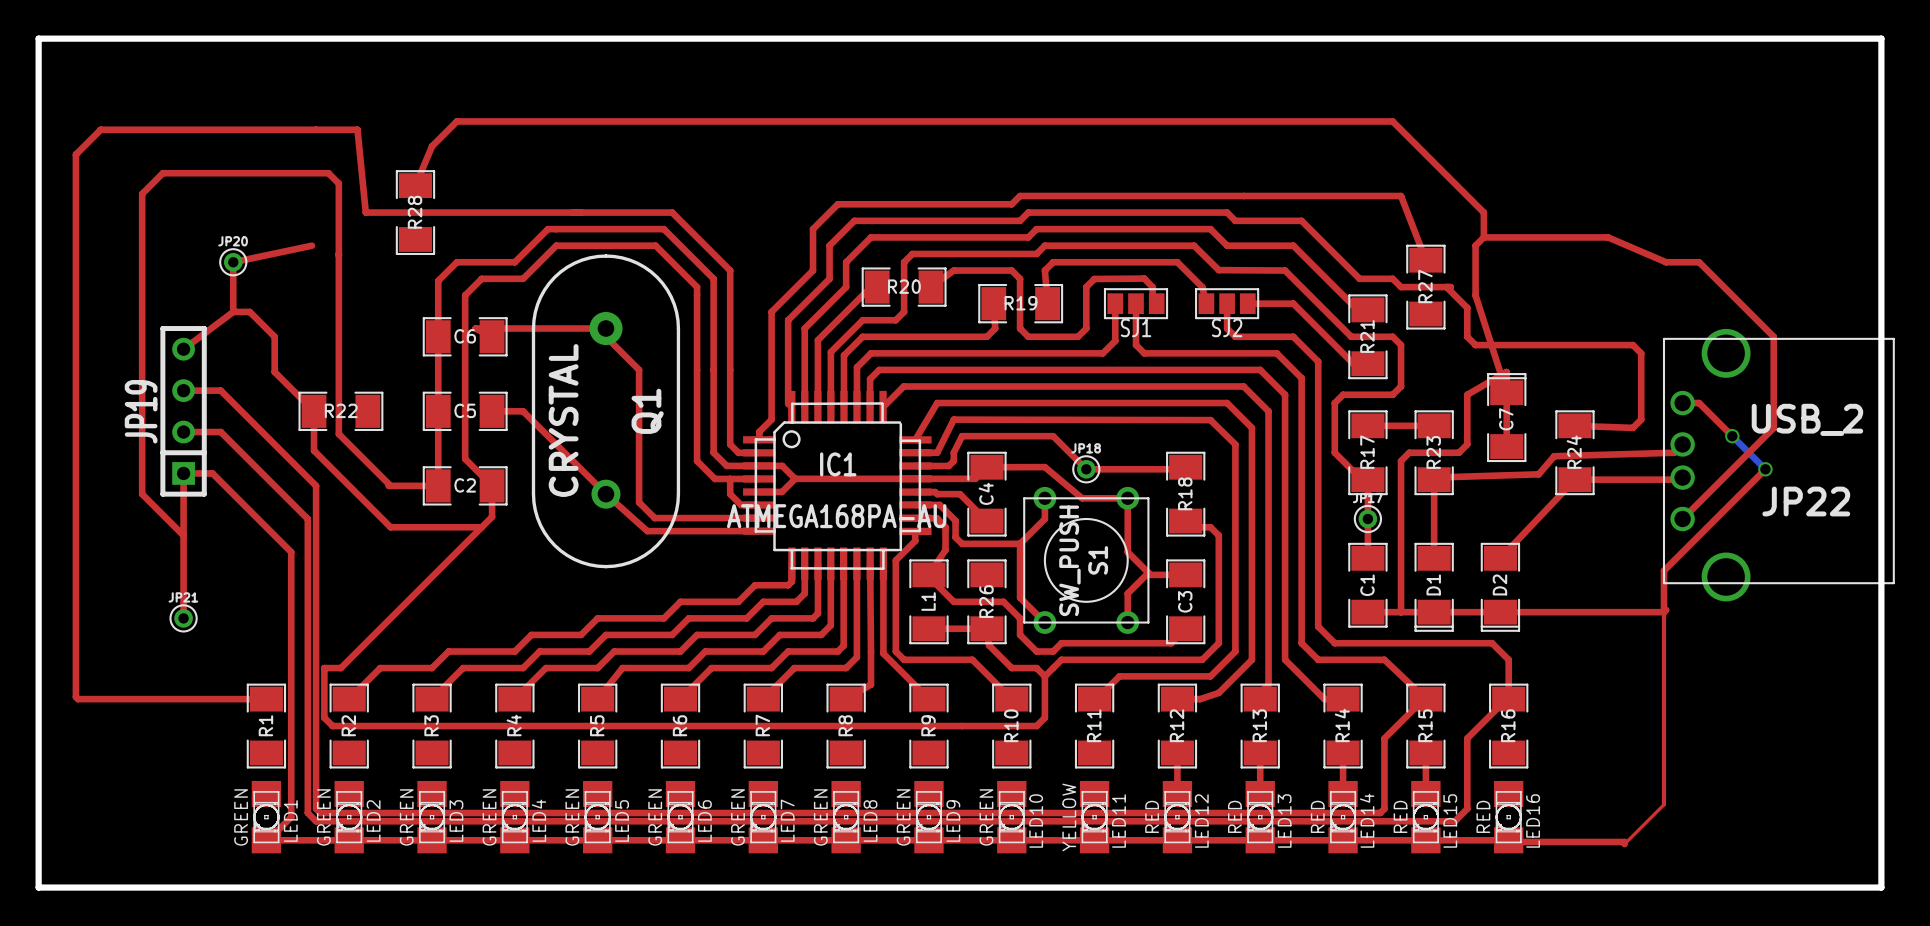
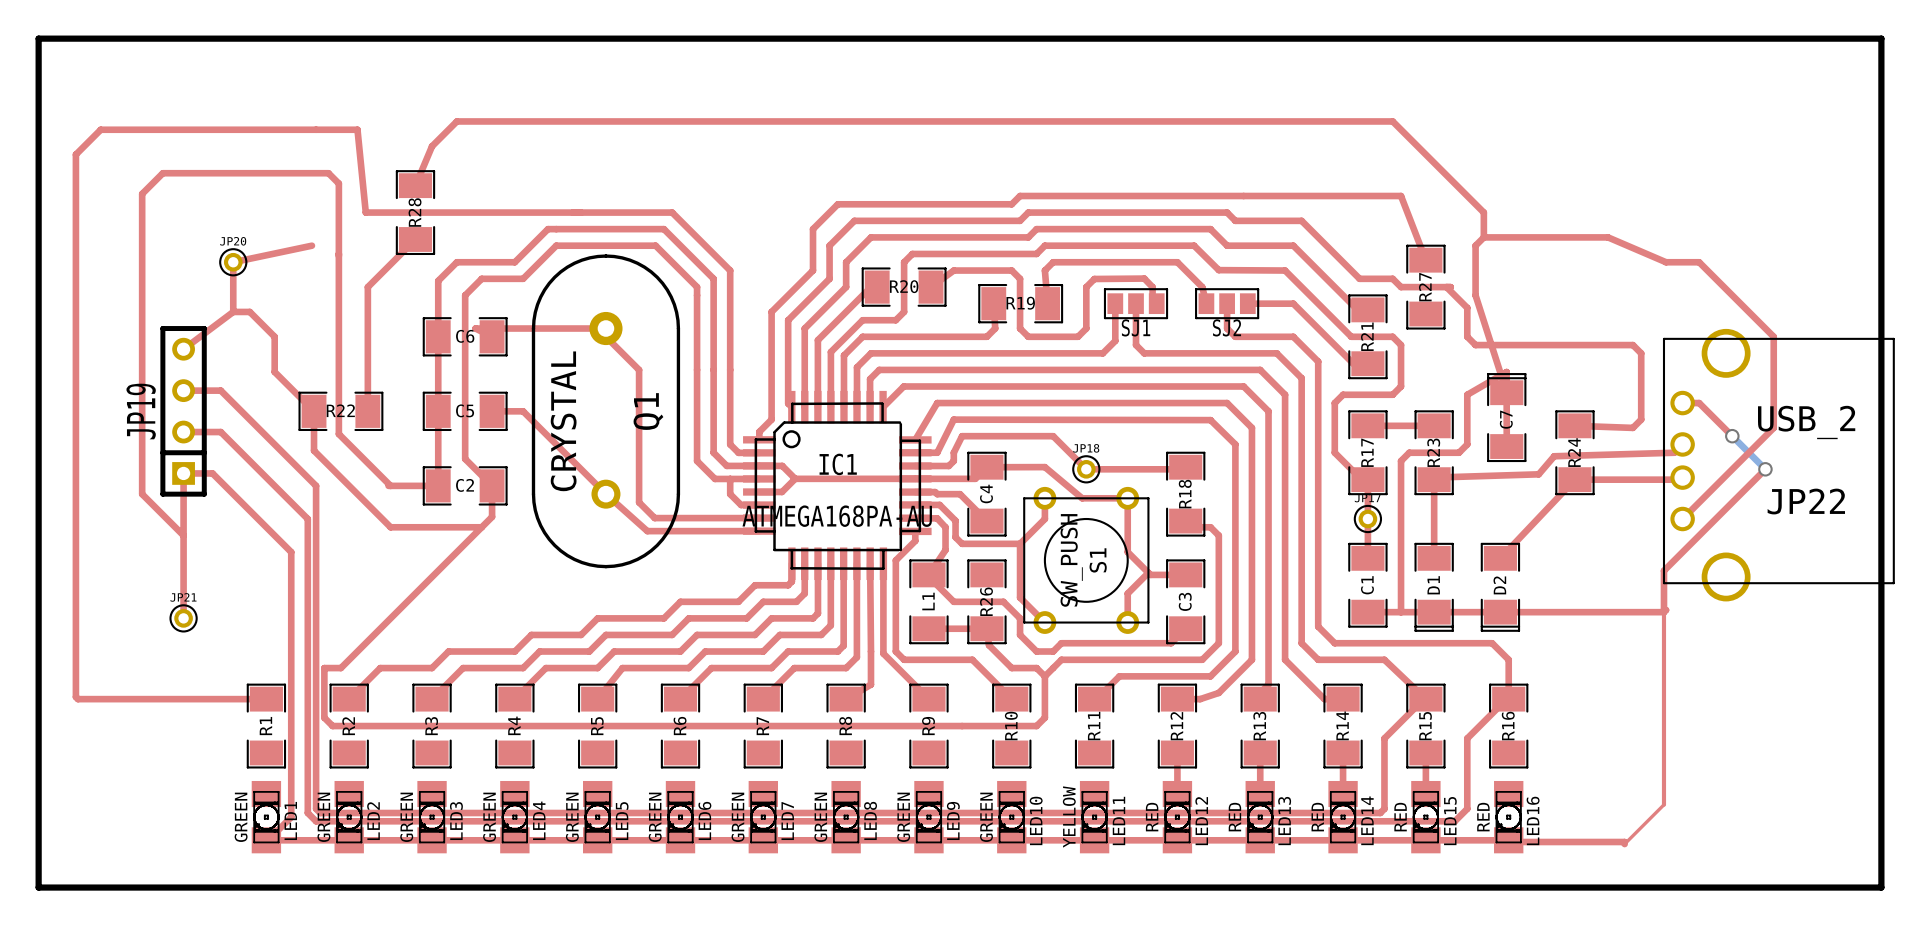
top track: none -> (415, 239) (367, 287) (367, 411)

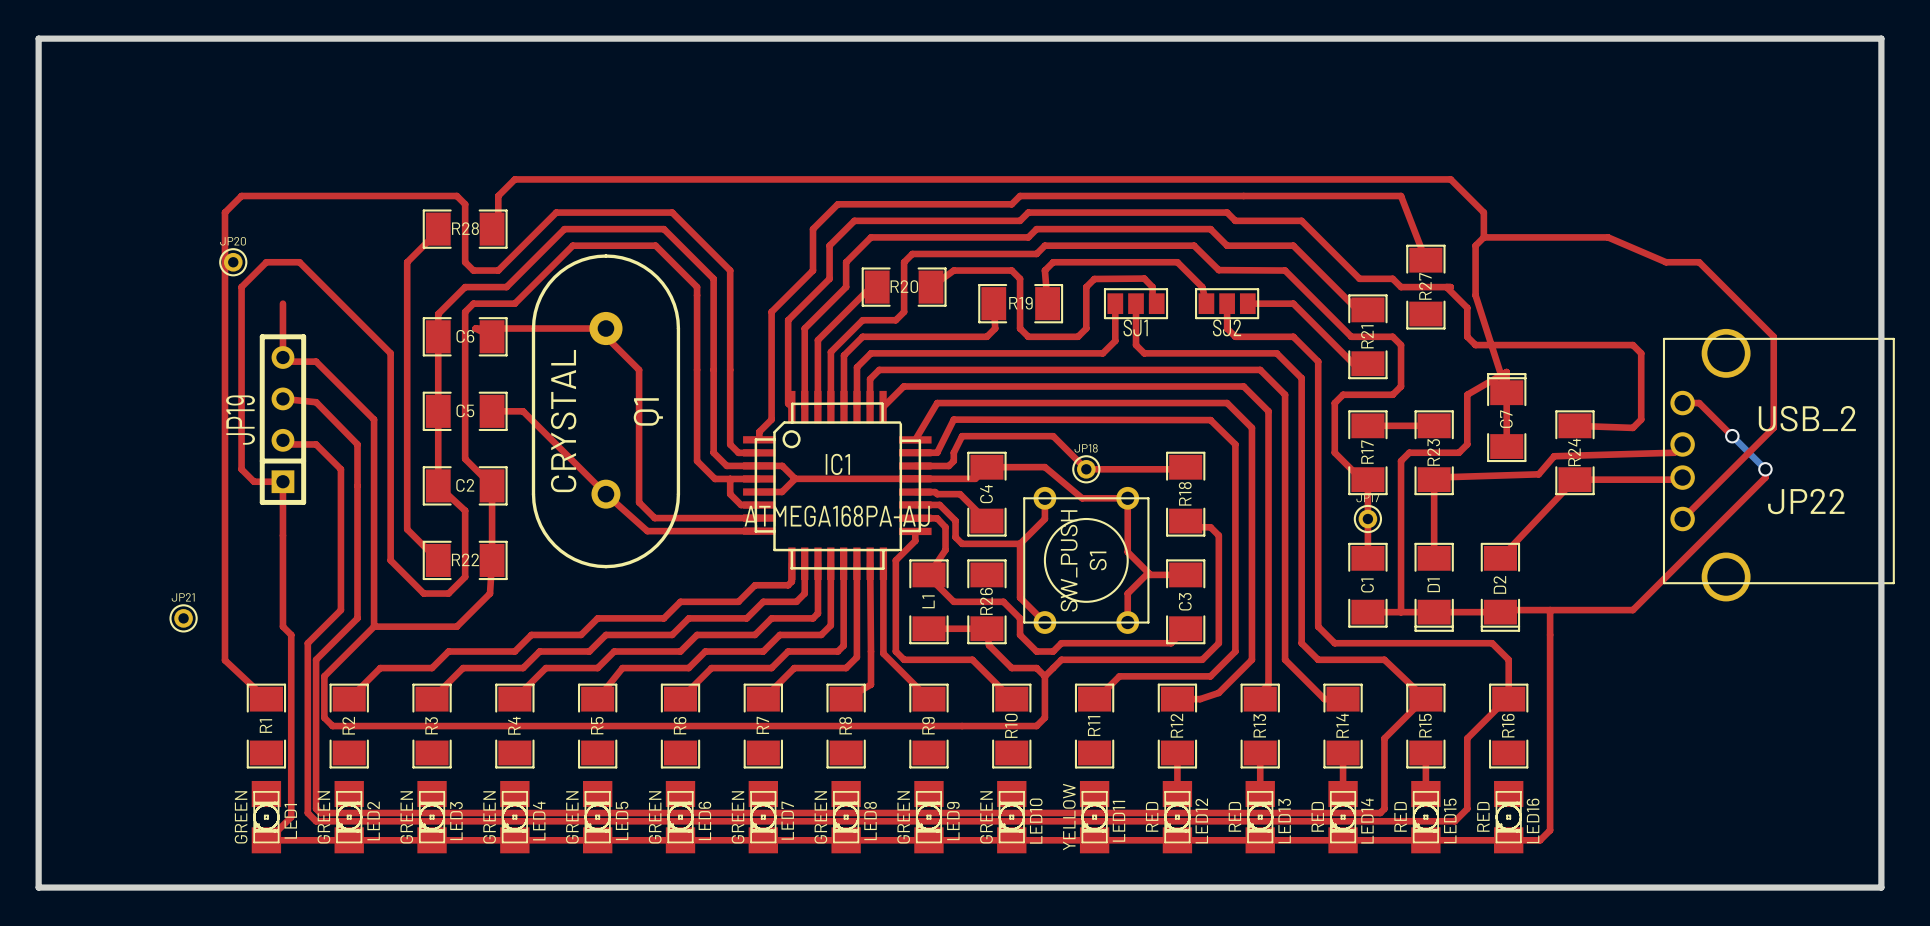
top track: (1450, 179) (1392, 121) (456, 121) (432, 146) (415, 185) -> (1450, 179) (514, 179) (498, 196) (498, 222) (492, 229)
R28 rotation: 0° (415, 212) -> 90° clockwise (465, 229)
R28 position: (415, 212) -> (465, 229)
top track: (556, 212) (365, 212) (357, 129) (100, 129) (75, 154) (75, 697) (77, 699) (266, 699) -> (556, 212) (498, 270) (473, 270) (465, 262) (465, 204) (456, 196) (241, 196) (224, 212) (224, 660) (266, 699)
top track: none -> (438, 229) (407, 262) (407, 529) (438, 560)
top track: (564, 229) (547, 229) (514, 262) (456, 262) (438, 280) (438, 314) -> (564, 229) (506, 287) (465, 287) (438, 314)
top track: (415, 239) (367, 287) (367, 411) -> none
top track: (311, 245) (233, 262) (233, 311) -> none
top track: (572, 245) (556, 245) (523, 278) (481, 278) (465, 295) (465, 311) -> (572, 245) (514, 303) (473, 303) (465, 311)
top track: none -> (282, 303) (282, 357) (287, 361) (316, 361) (374, 419) (374, 626)
top track: (233, 311) (249, 311) (274, 336) (274, 371) (314, 411) (314, 450) (390, 527) (481, 527) -> none
top track: (233, 311) (183, 349) -> none
top track: (183, 390) (220, 390) (316, 485) (316, 659) -> (282, 398) (316, 402) (357, 444) (357, 618) (316, 659)
JP19 position: (183, 411) -> (282, 419)
R22 position: (340, 411) -> (465, 560)
top track: (183, 432) (220, 432) (307, 519) (307, 643) -> (282, 440) (287, 444) (316, 444) (340, 469) (340, 610) (307, 643)
top track: (1765, 469) (1663, 570) (1663, 612) -> (1765, 469) (1765, 477) (1632, 610) (1502, 610) (1500, 612)
top track: (388, 485) (438, 485) -> (291, 634) (282, 626) (282, 481) (253, 481) (241, 469) (241, 287) (266, 262) (299, 262) (390, 353) (390, 560) (423, 593) (448, 593) (465, 576) (465, 510) (438, 485)
top track: (390, 485) (338, 434) (338, 183) (328, 173) (162, 173) (142, 193) (142, 494) (183, 535) -> none
top track: (492, 516) (340, 668) (324, 668) (324, 676) -> (492, 516) (490, 593) (456, 626) (374, 626)
top track: none -> (1550, 610) (1550, 830) (1540, 840) (1508, 840)
top track: (1500, 612) (1663, 612) -> none
top track: (1663, 612) (1666, 610) (1663, 610) (1663, 804) (1624, 844) (1624, 842) (1510, 842) -> none
top track: (183, 618) (183, 473) (212, 473) (291, 552) (291, 634) -> none
top track: none -> (374, 626) (324, 676)

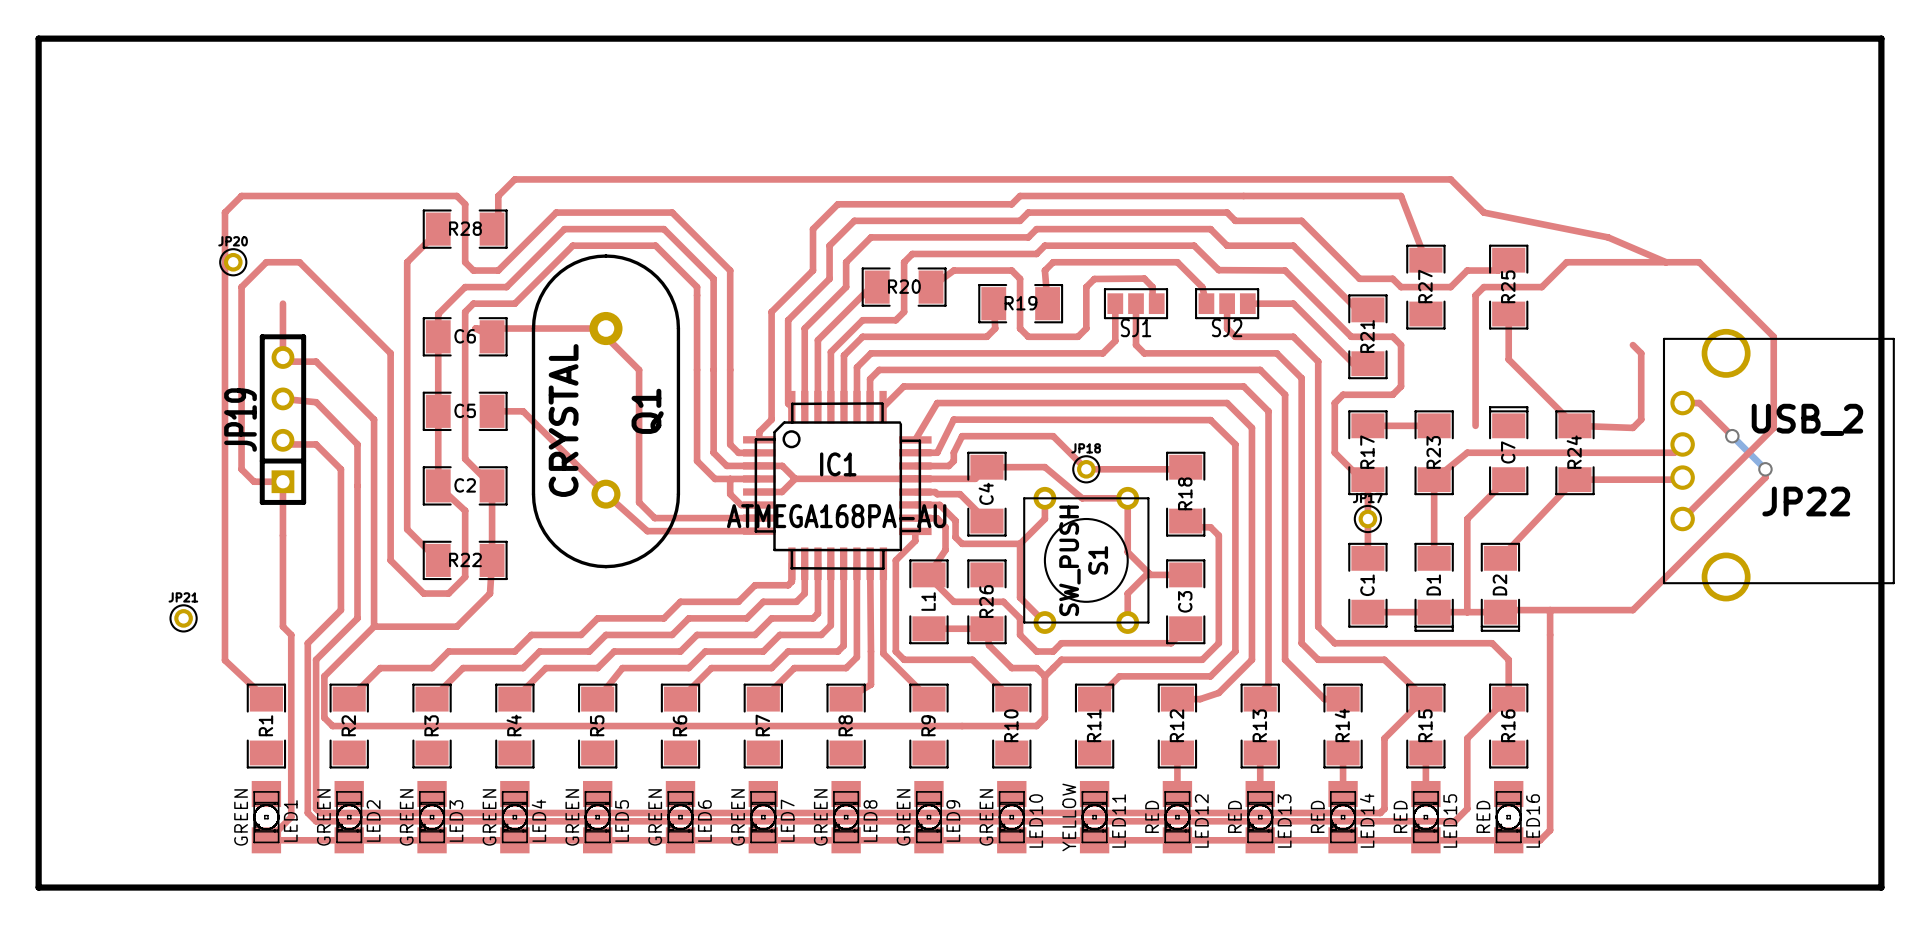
top track: (1483, 212) (1483, 237) -> none
top track: (1483, 237) (1608, 237) -> (1483, 212) (1608, 237)
top track: (1483, 237) (1475, 245) (1475, 295) (1506, 392) -> none
top track: none -> (1508, 260) (1498, 270) (1467, 270) (1450, 287)
top track: none -> (1666, 262) (1566, 262) (1541, 287) (1483, 287) (1475, 295) (1475, 425)
top track: (1446, 287) (1467, 307) (1467, 336) (1475, 345) (1632, 345) -> none
R25: none -> (1508, 287)
top track: none -> (1508, 314) (1508, 359) (1574, 425)
C7 position: (1506, 417) -> (1508, 450)
top track: (1506, 446) (1506, 371) (1467, 394) (1467, 444) (1459, 452) (1409, 452) (1401, 461) (1401, 612) -> none
top track: (1674, 452) (1554, 456) (1538, 474) (1434, 477) -> (1674, 452) (1467, 452) (1434, 479)
top track: none -> (1508, 479) (1467, 519) (1467, 612)

